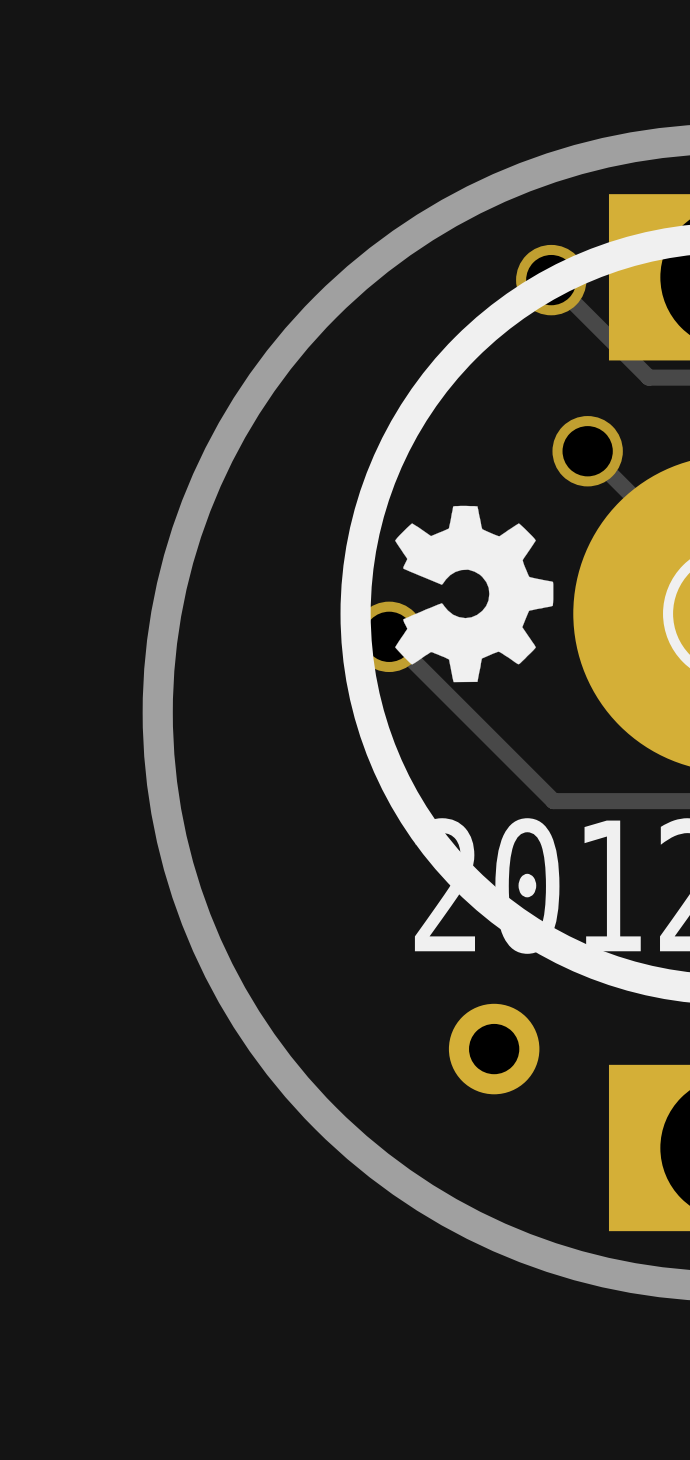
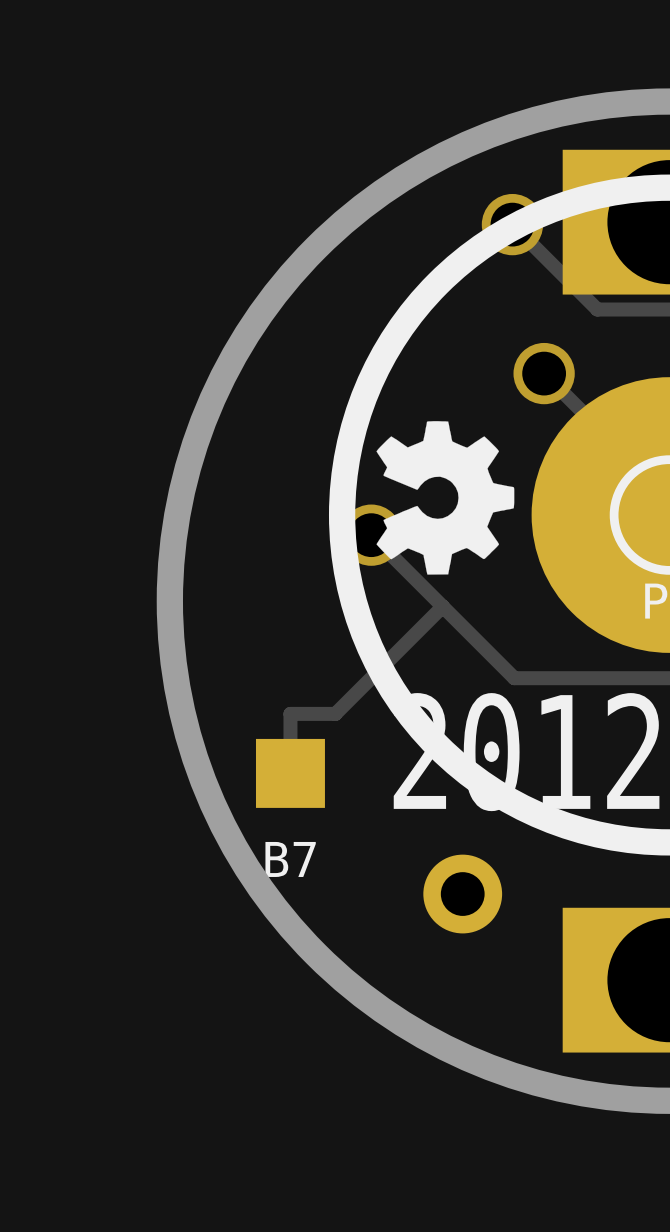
track: none -> (442, 606) (335, 713) (290, 713) (290, 773)
B7: none -> (290, 773)

